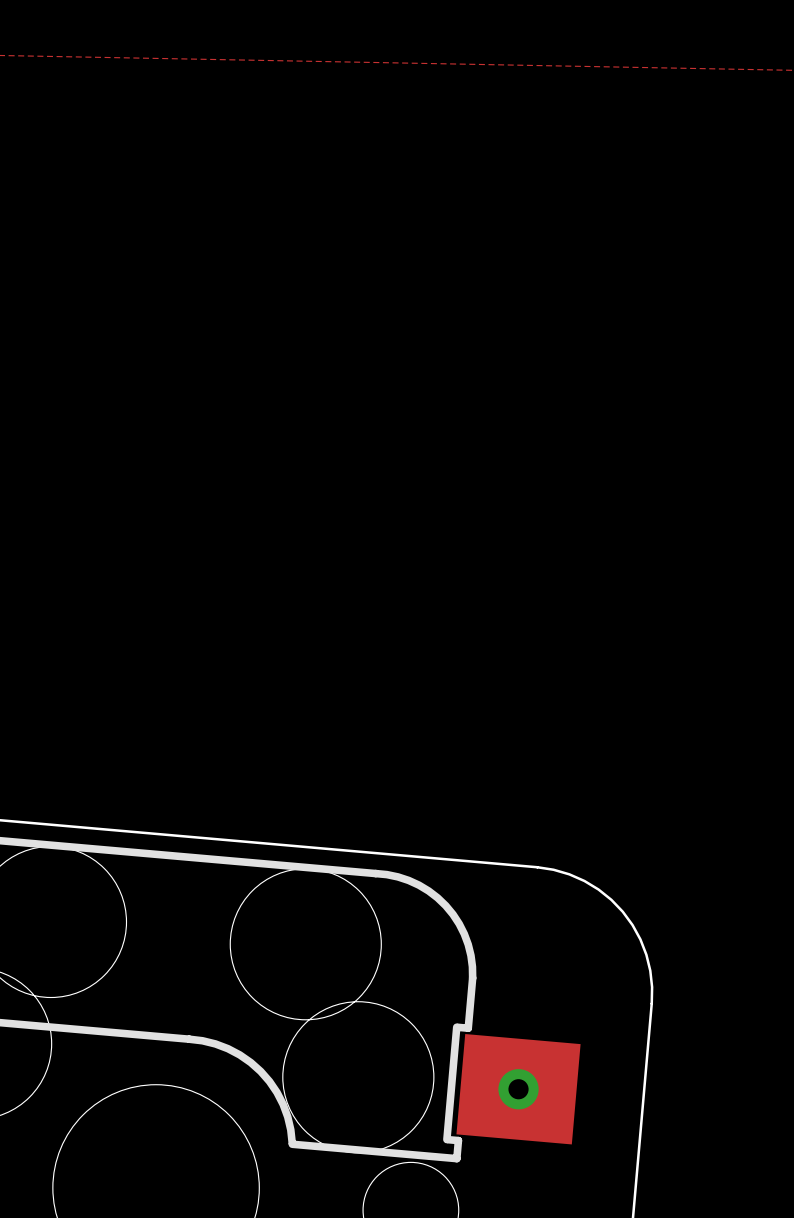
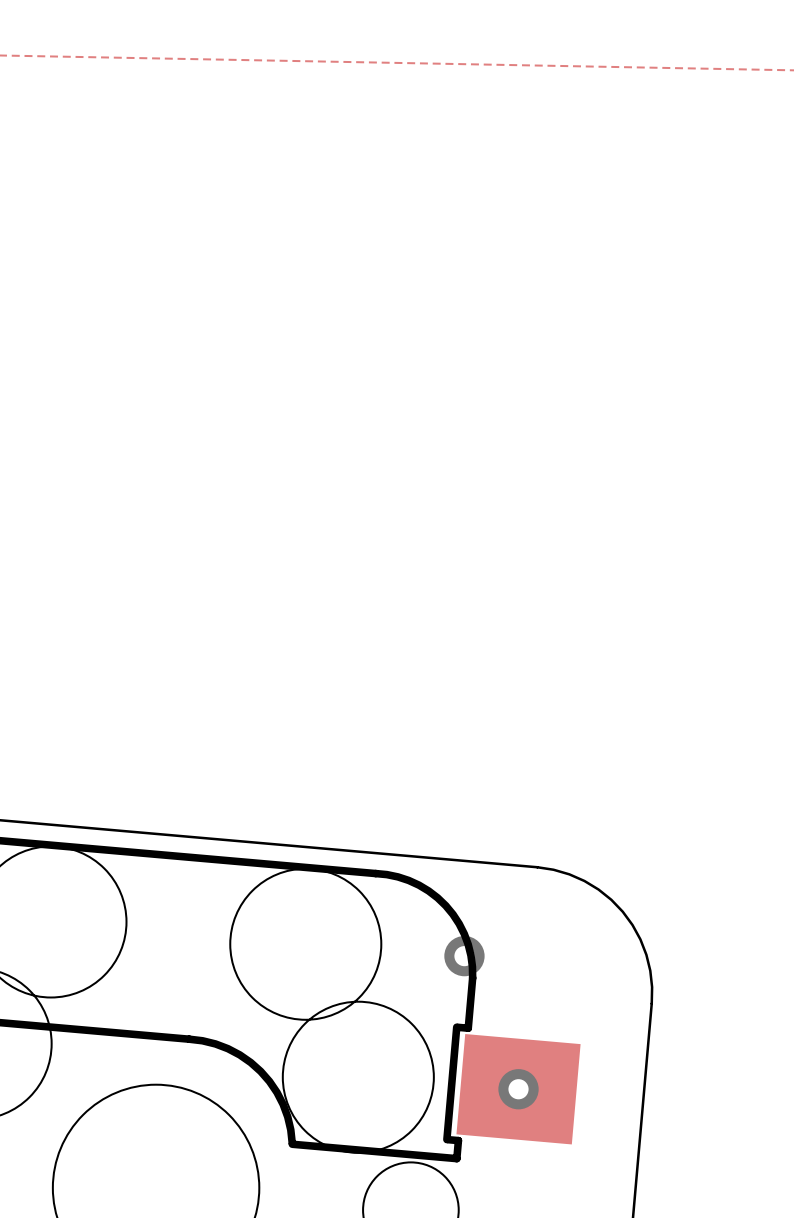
via: none -> (464, 956)

